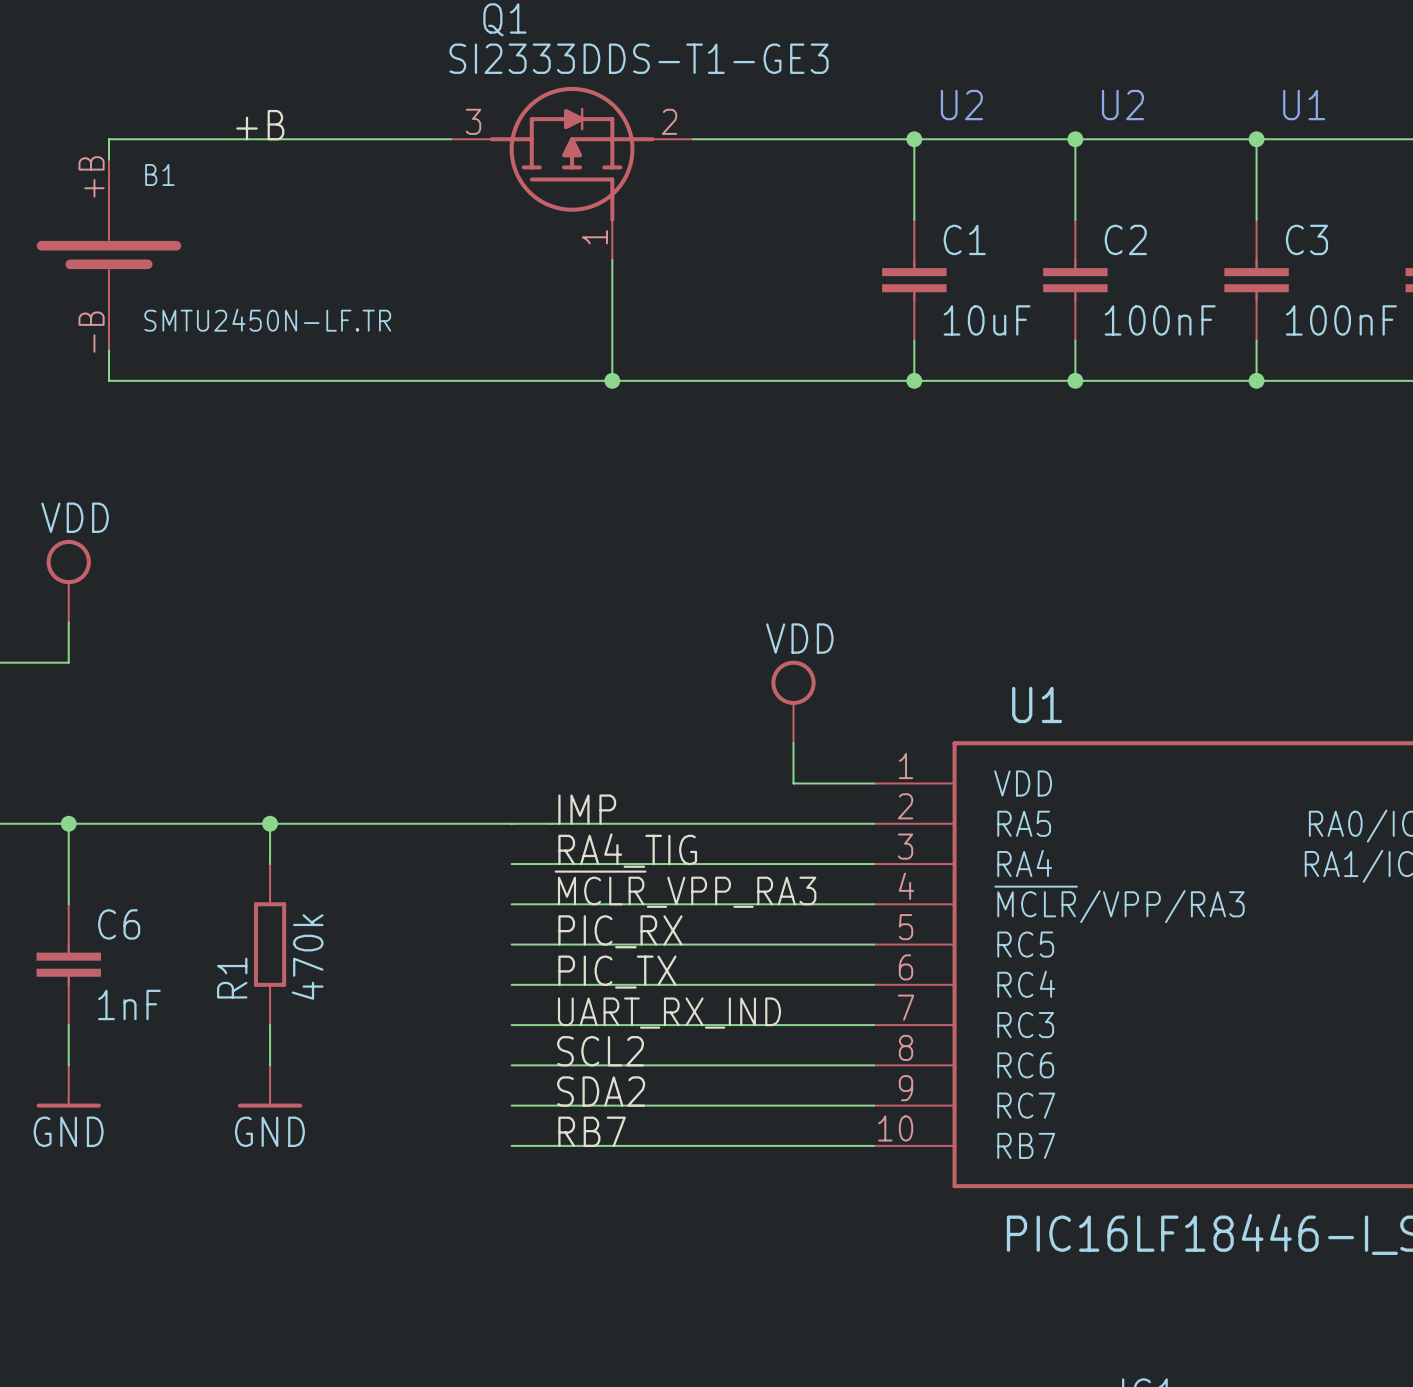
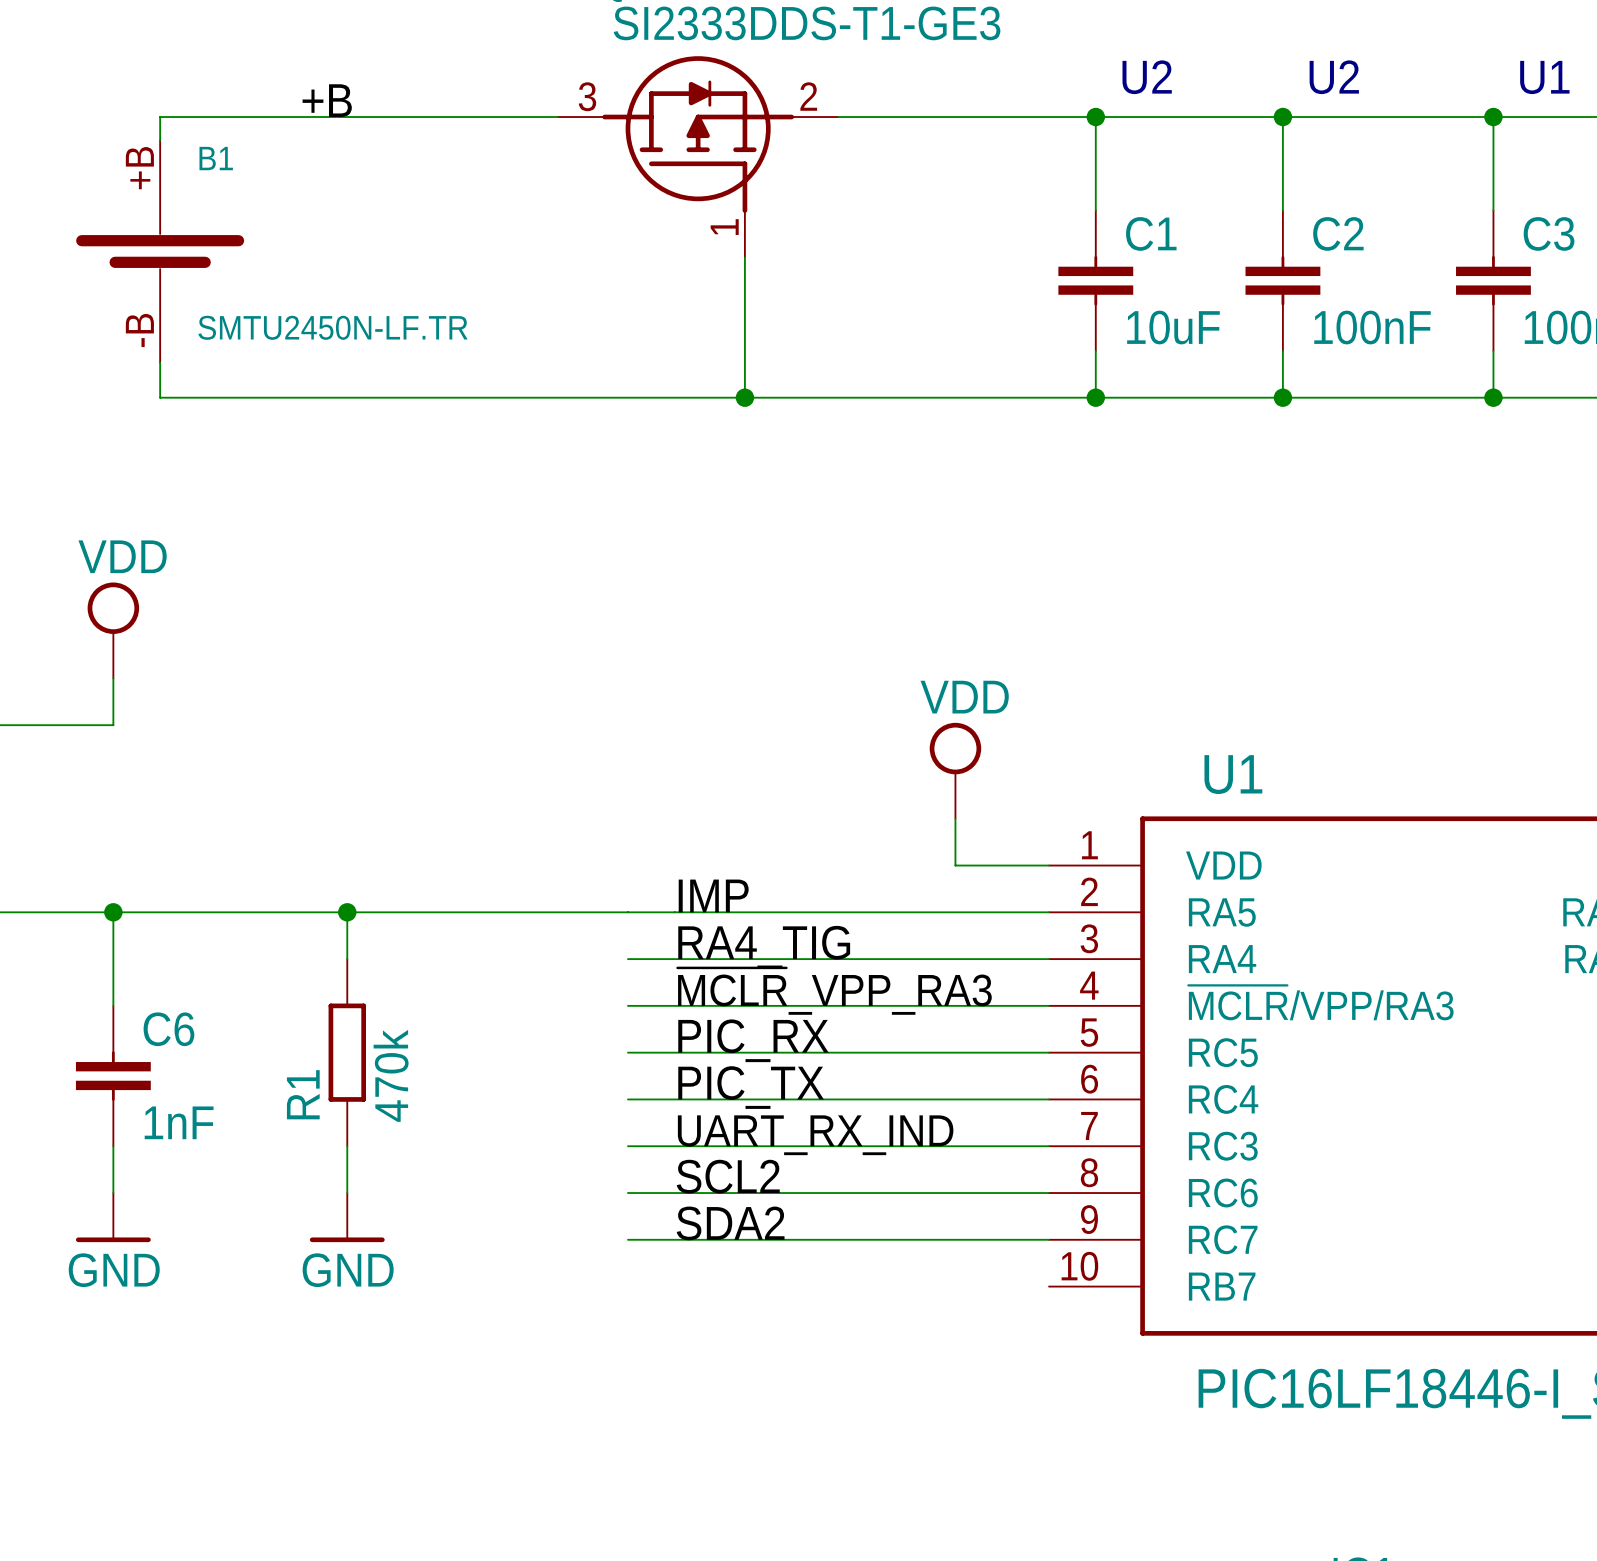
label: RB7 (592, 1131) -> none
wire: (511, 1145) (874, 1145) -> none

